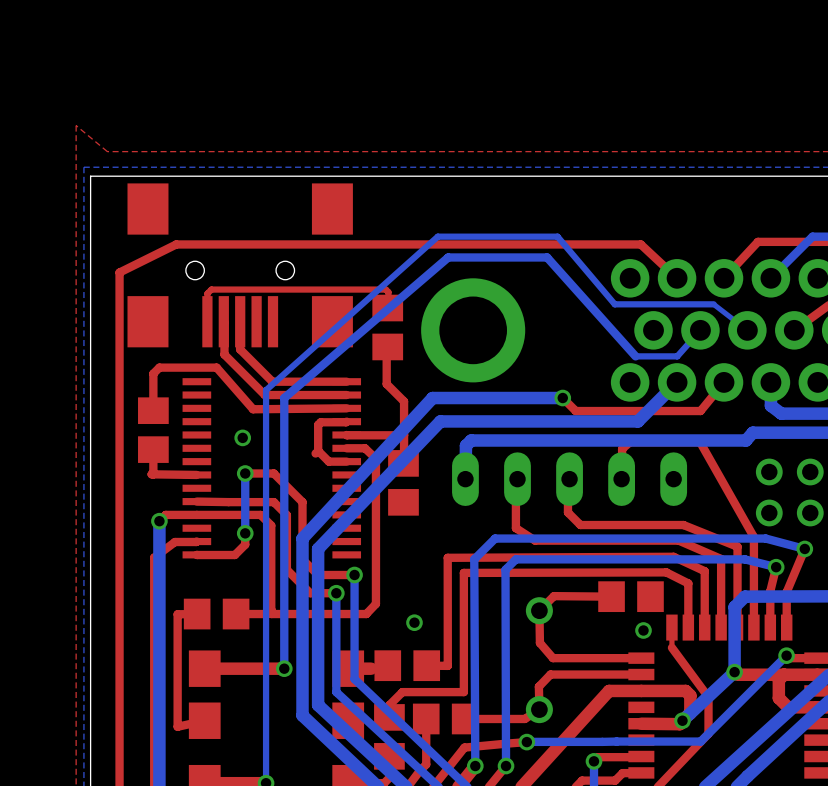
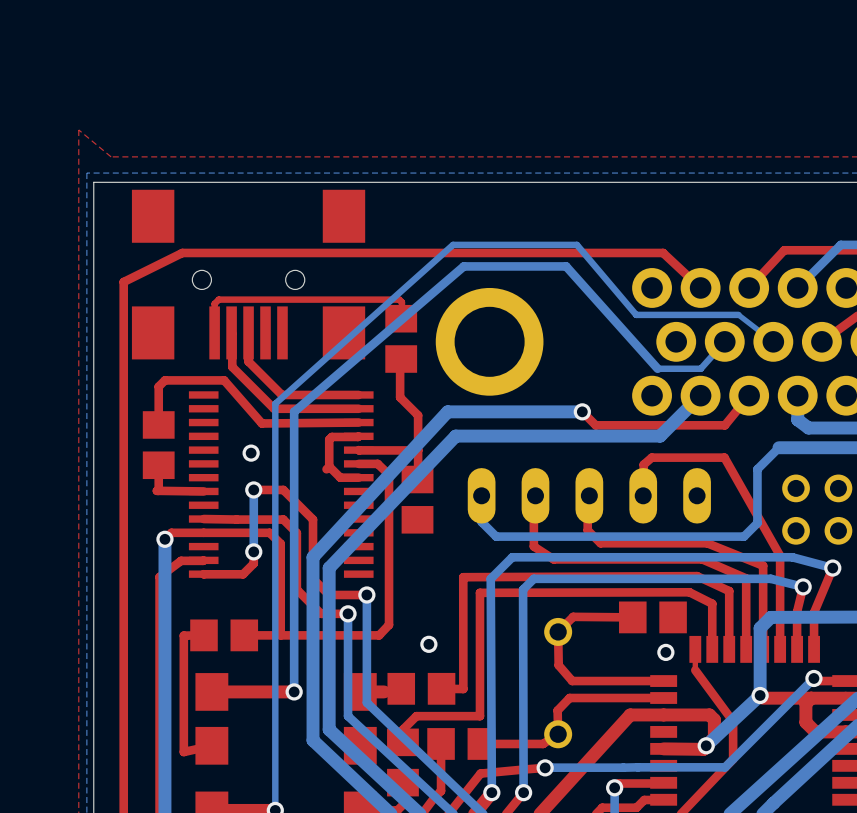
bottom track: (752, 432) (746, 440) (471, 440) (465, 445) (465, 479) -> (778, 447) (757, 469) (757, 523) (743, 536) (496, 536) (481, 522) (481, 495)

